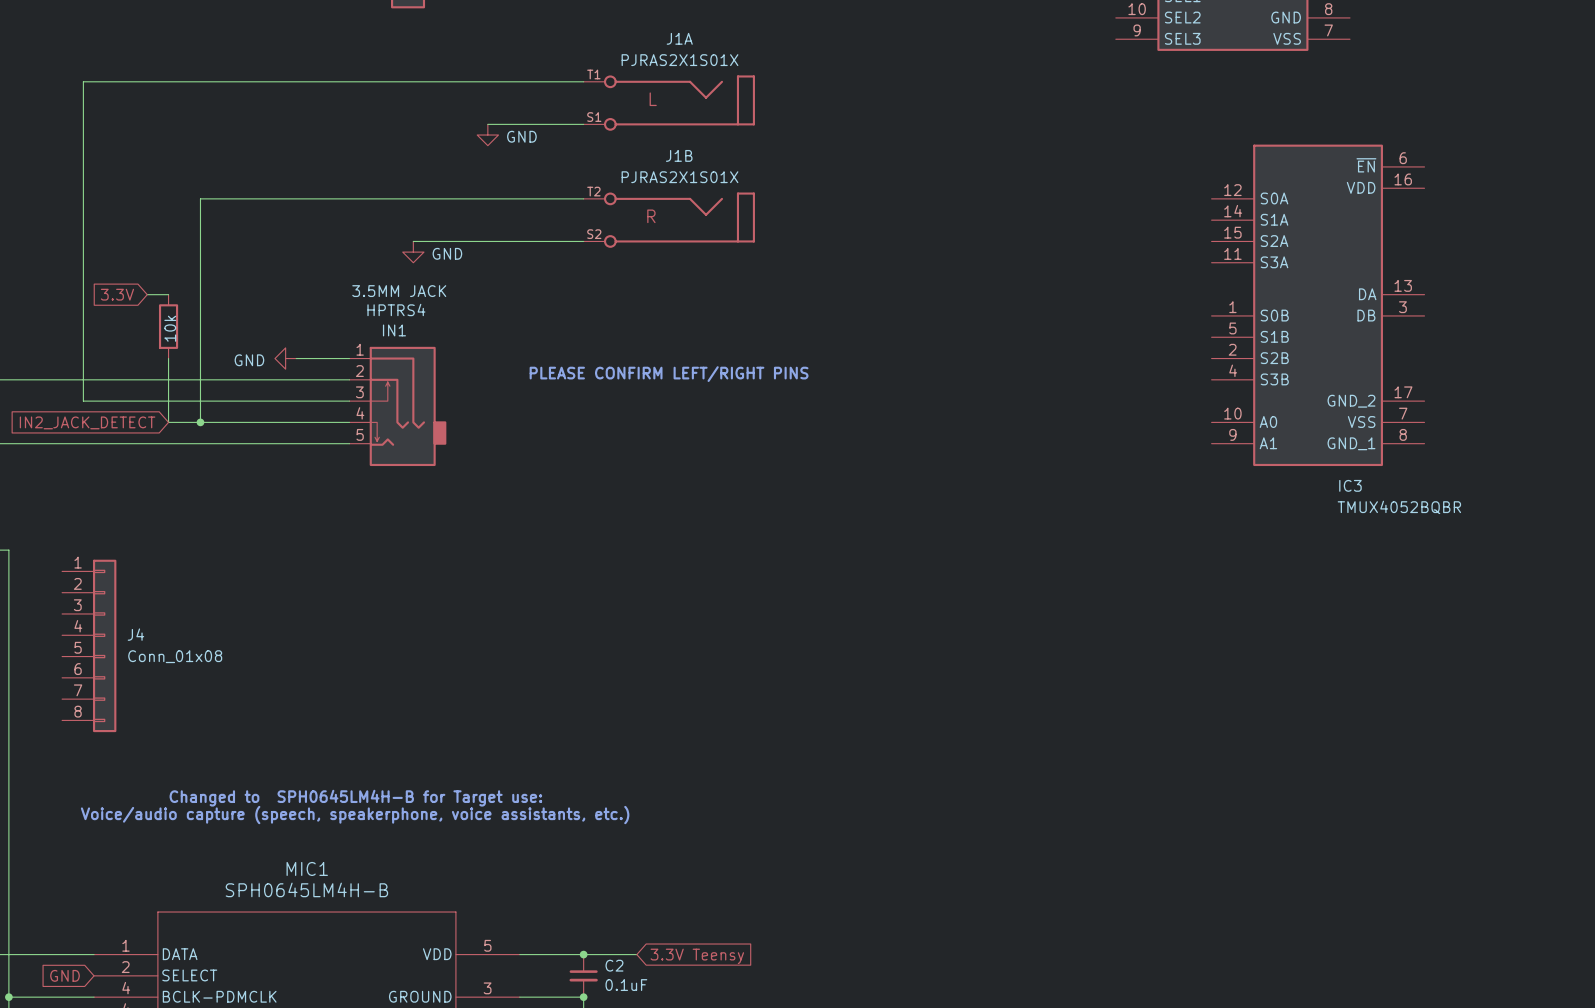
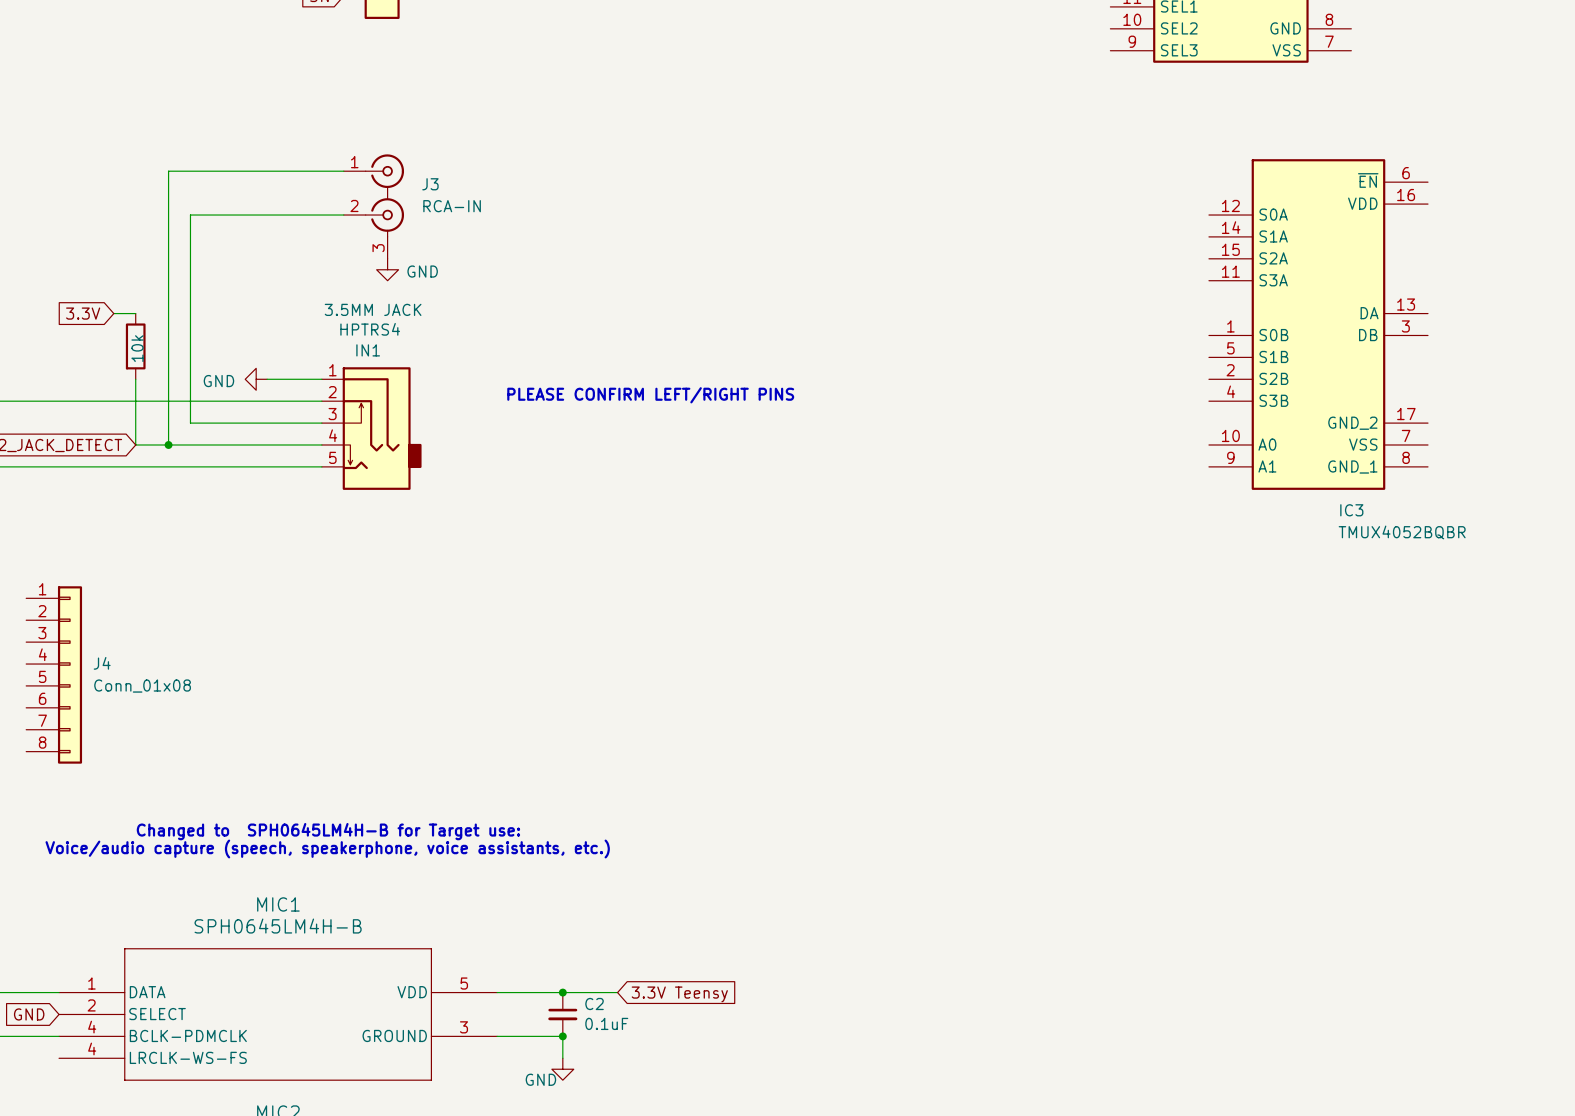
wire: (583, 81) (83, 81) (83, 401) (221, 401) -> (190, 215) (190, 423)
J1A: PJRAS2X1S01X (669, 103) -> none
wire: (487, 124) (583, 124) -> none
power symbol: GND (487, 135) -> none
J3: none -> RCA-IN (373, 206)
wire: (200, 198) (221, 198) -> (168, 215) (168, 171) (343, 171)
wire: (370, 198) (583, 198) -> none
J1B: PJRAS2X1S01X (669, 220) -> none
wire: (413, 241) (583, 241) -> none

